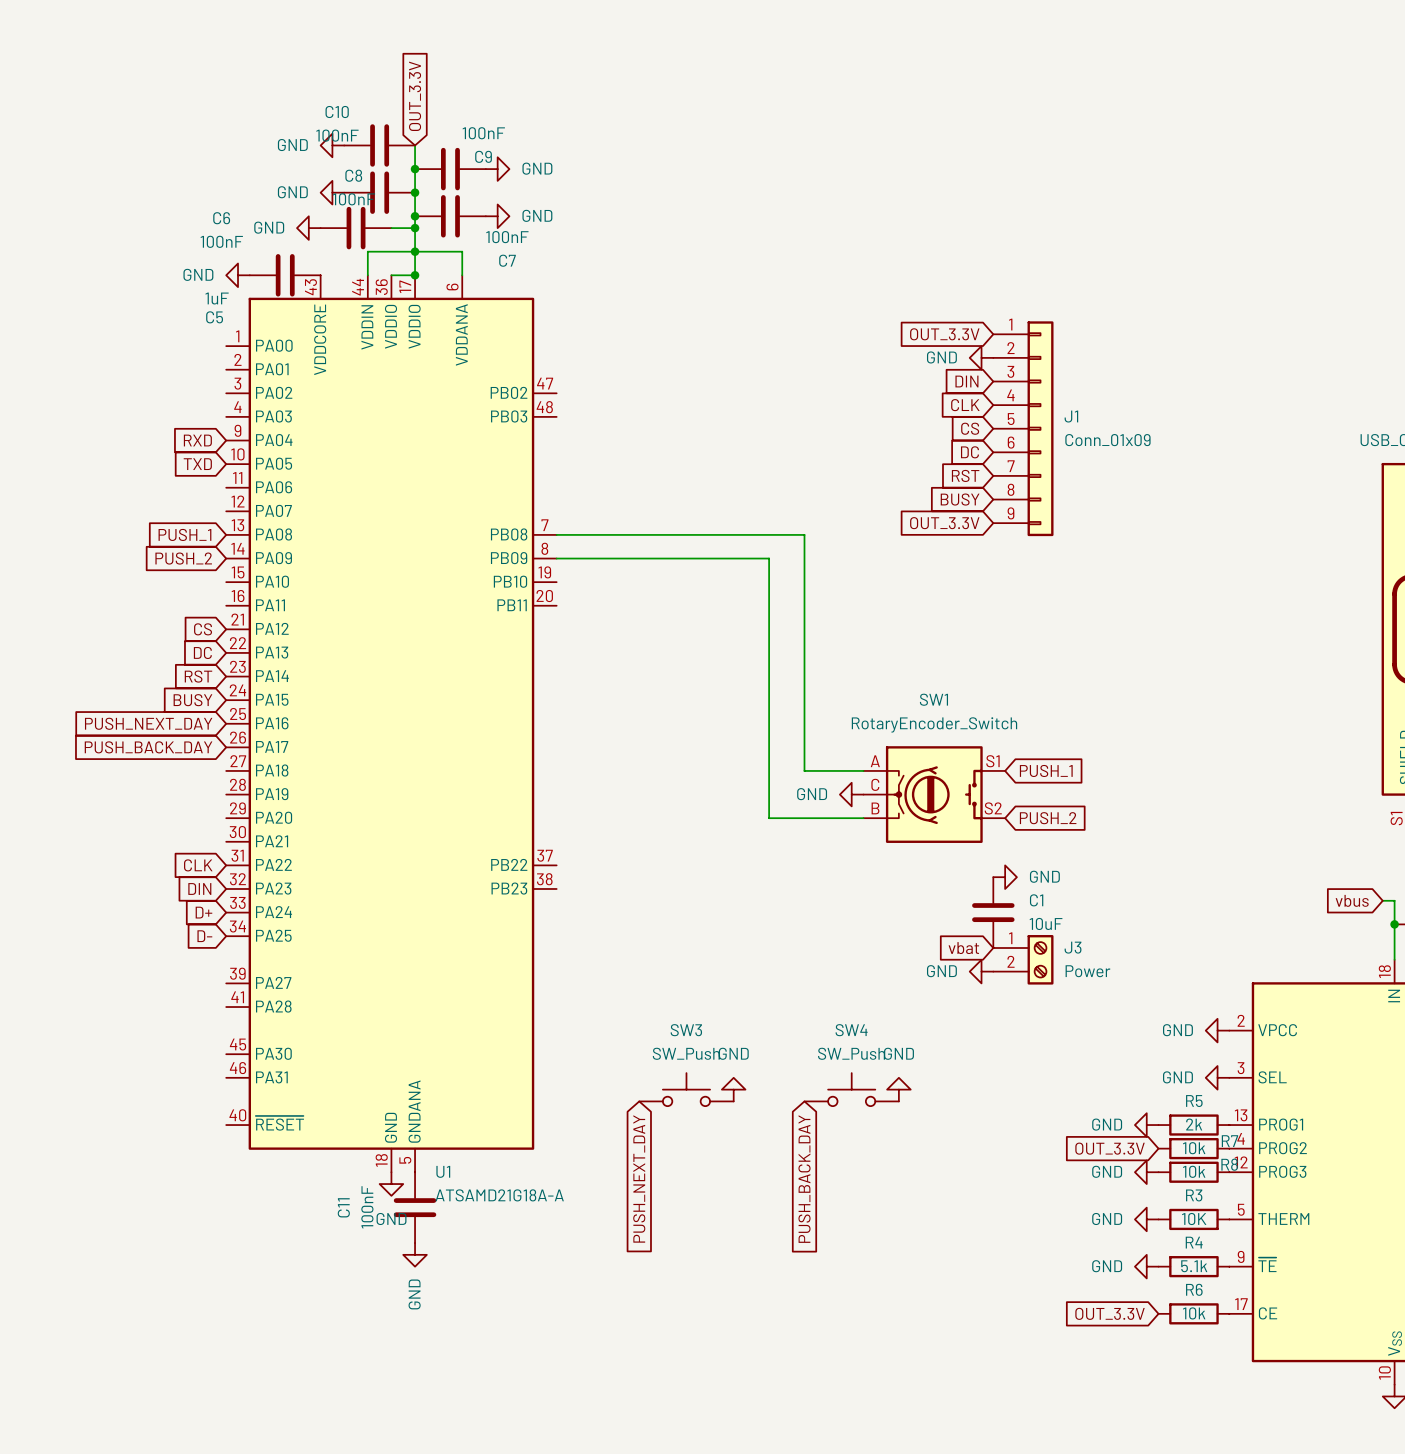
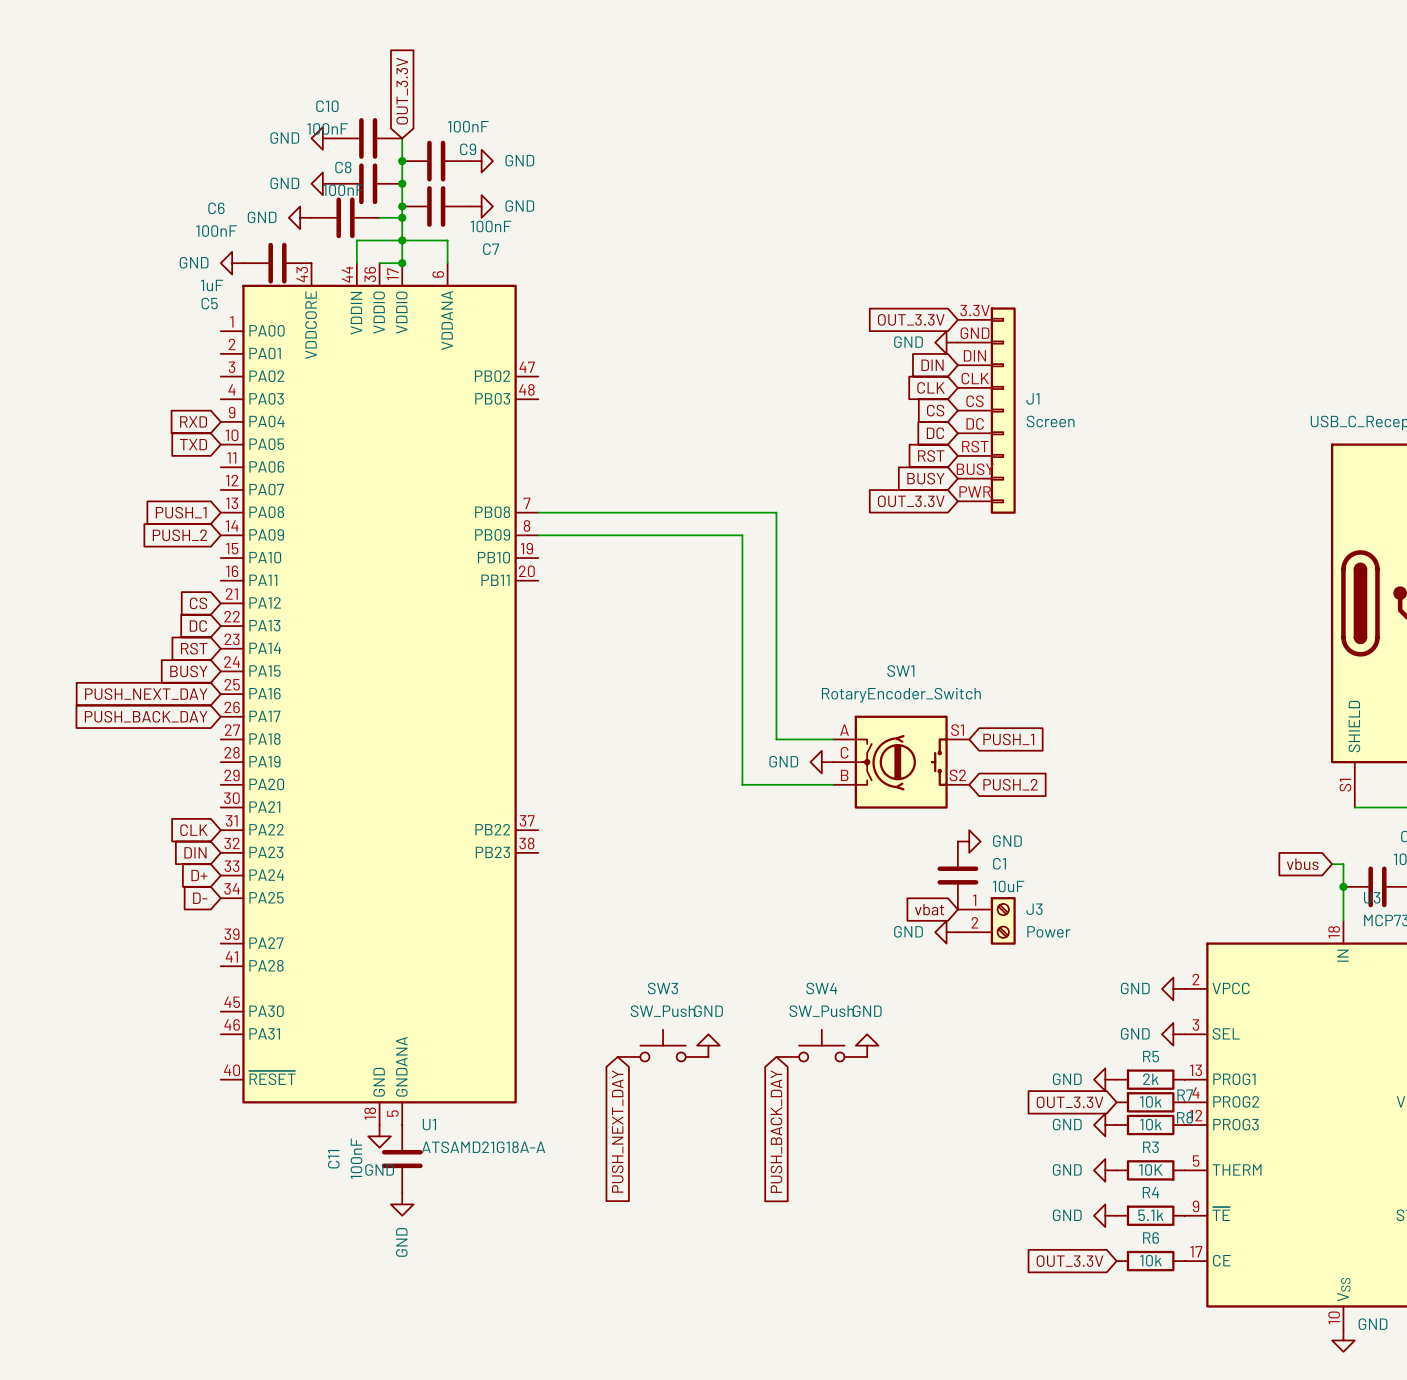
J1 symbol: [993, 321, 1054, 537] -> [957, 307, 1016, 514]
J1 value: Conn_01x09 (1107, 440) -> Screen (1050, 421)

